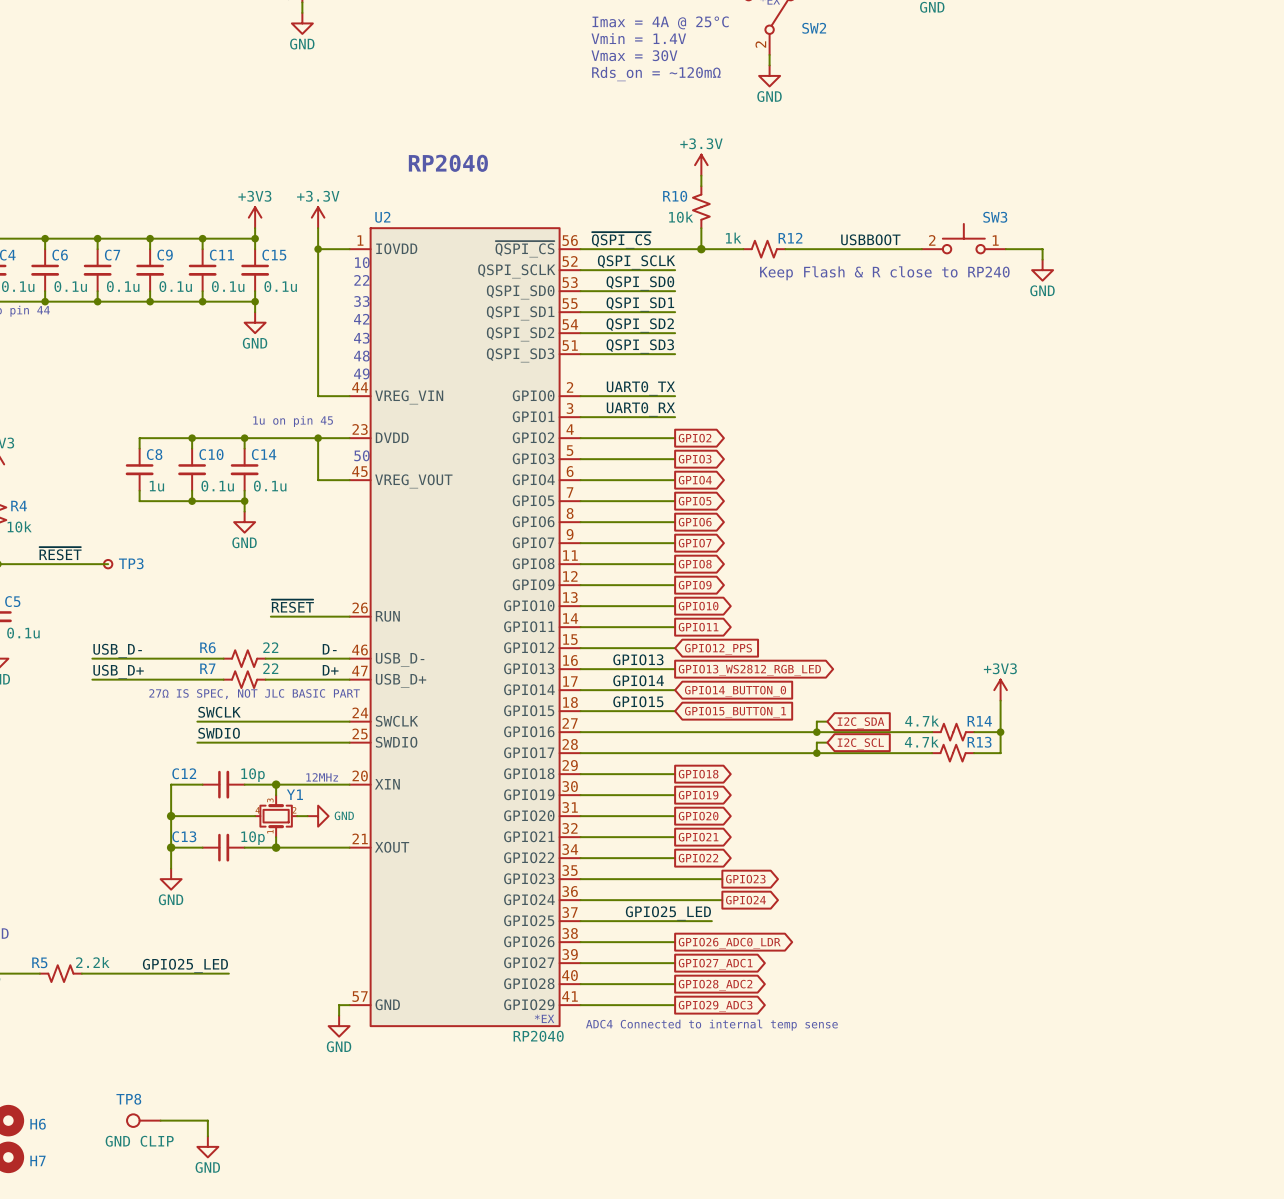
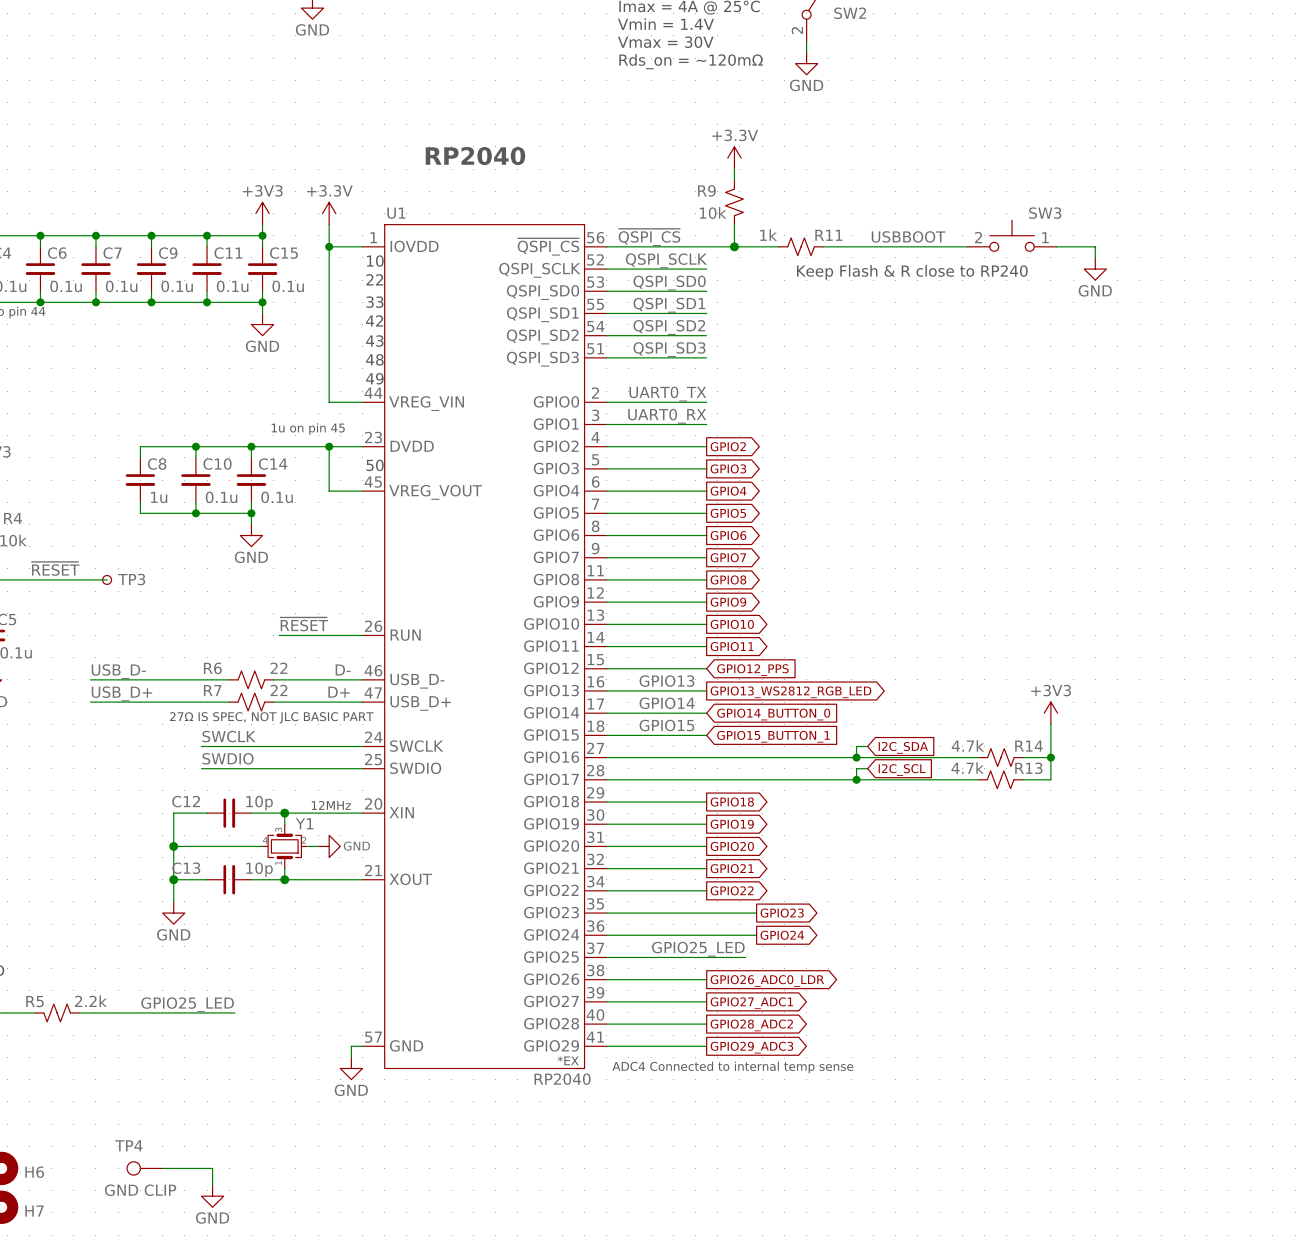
R10 name: R10 (675, 196) -> R9 (706, 190)
U2 name: U2 (382, 217) -> U1 (396, 213)
R12 name: R12 (790, 238) -> R11 (828, 235)
TP8 name: TP8 (128, 1099) -> TP4 (128, 1145)

